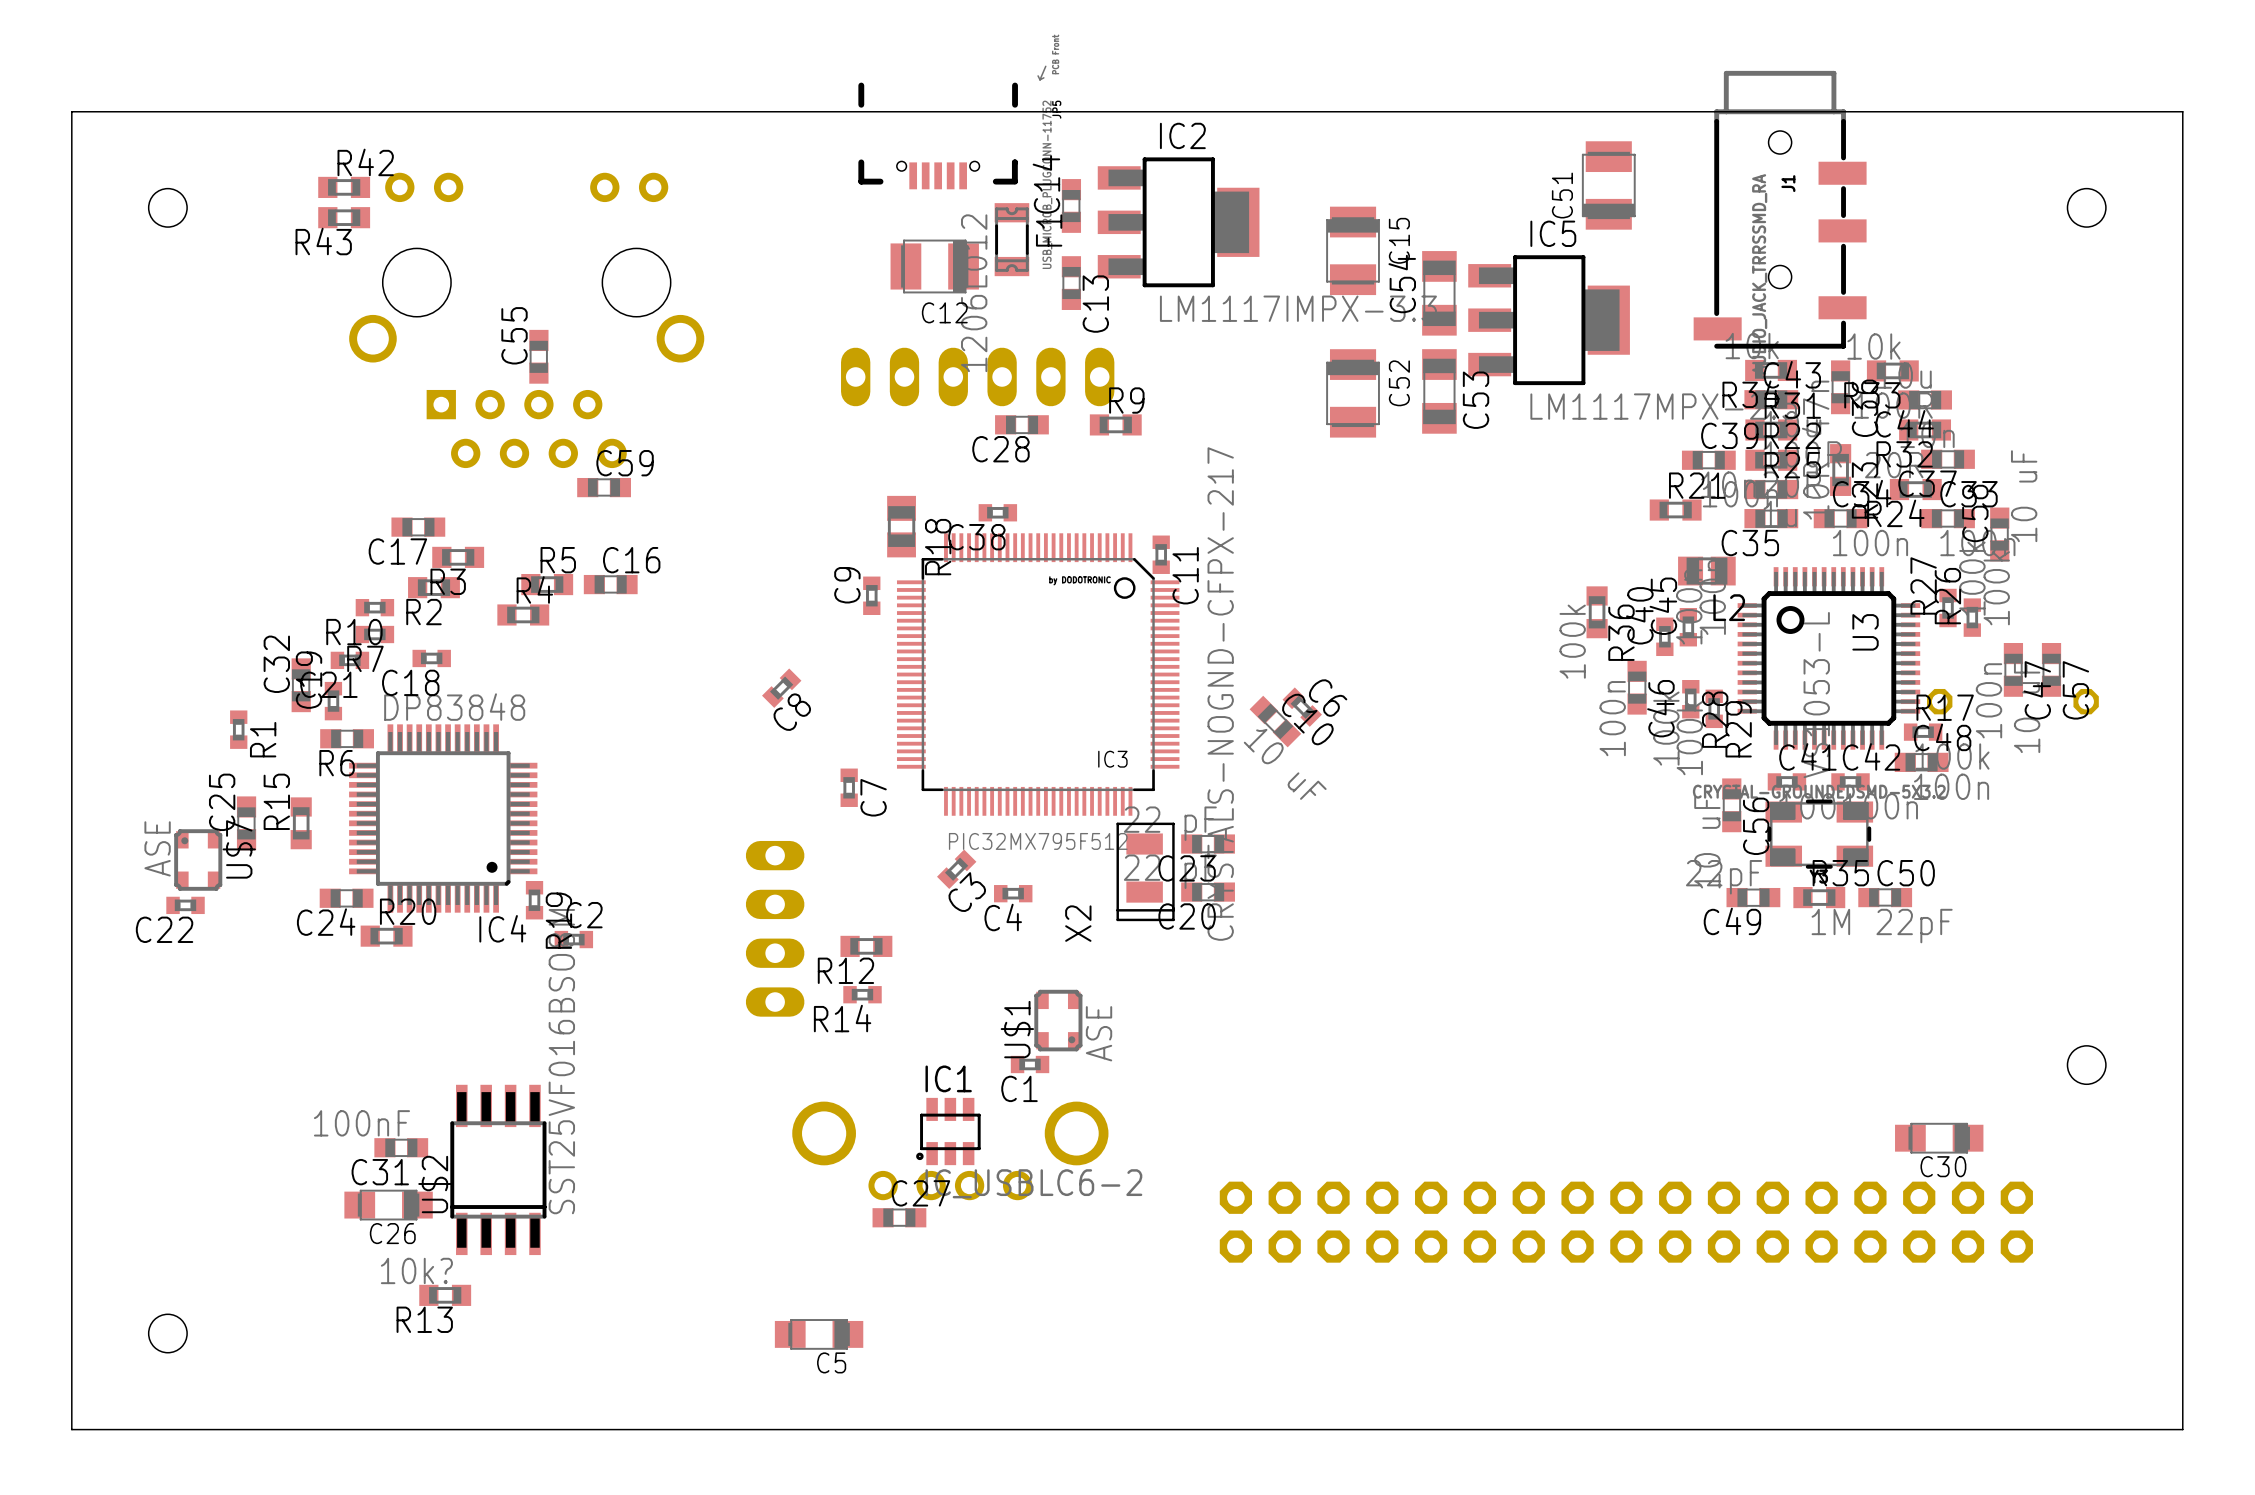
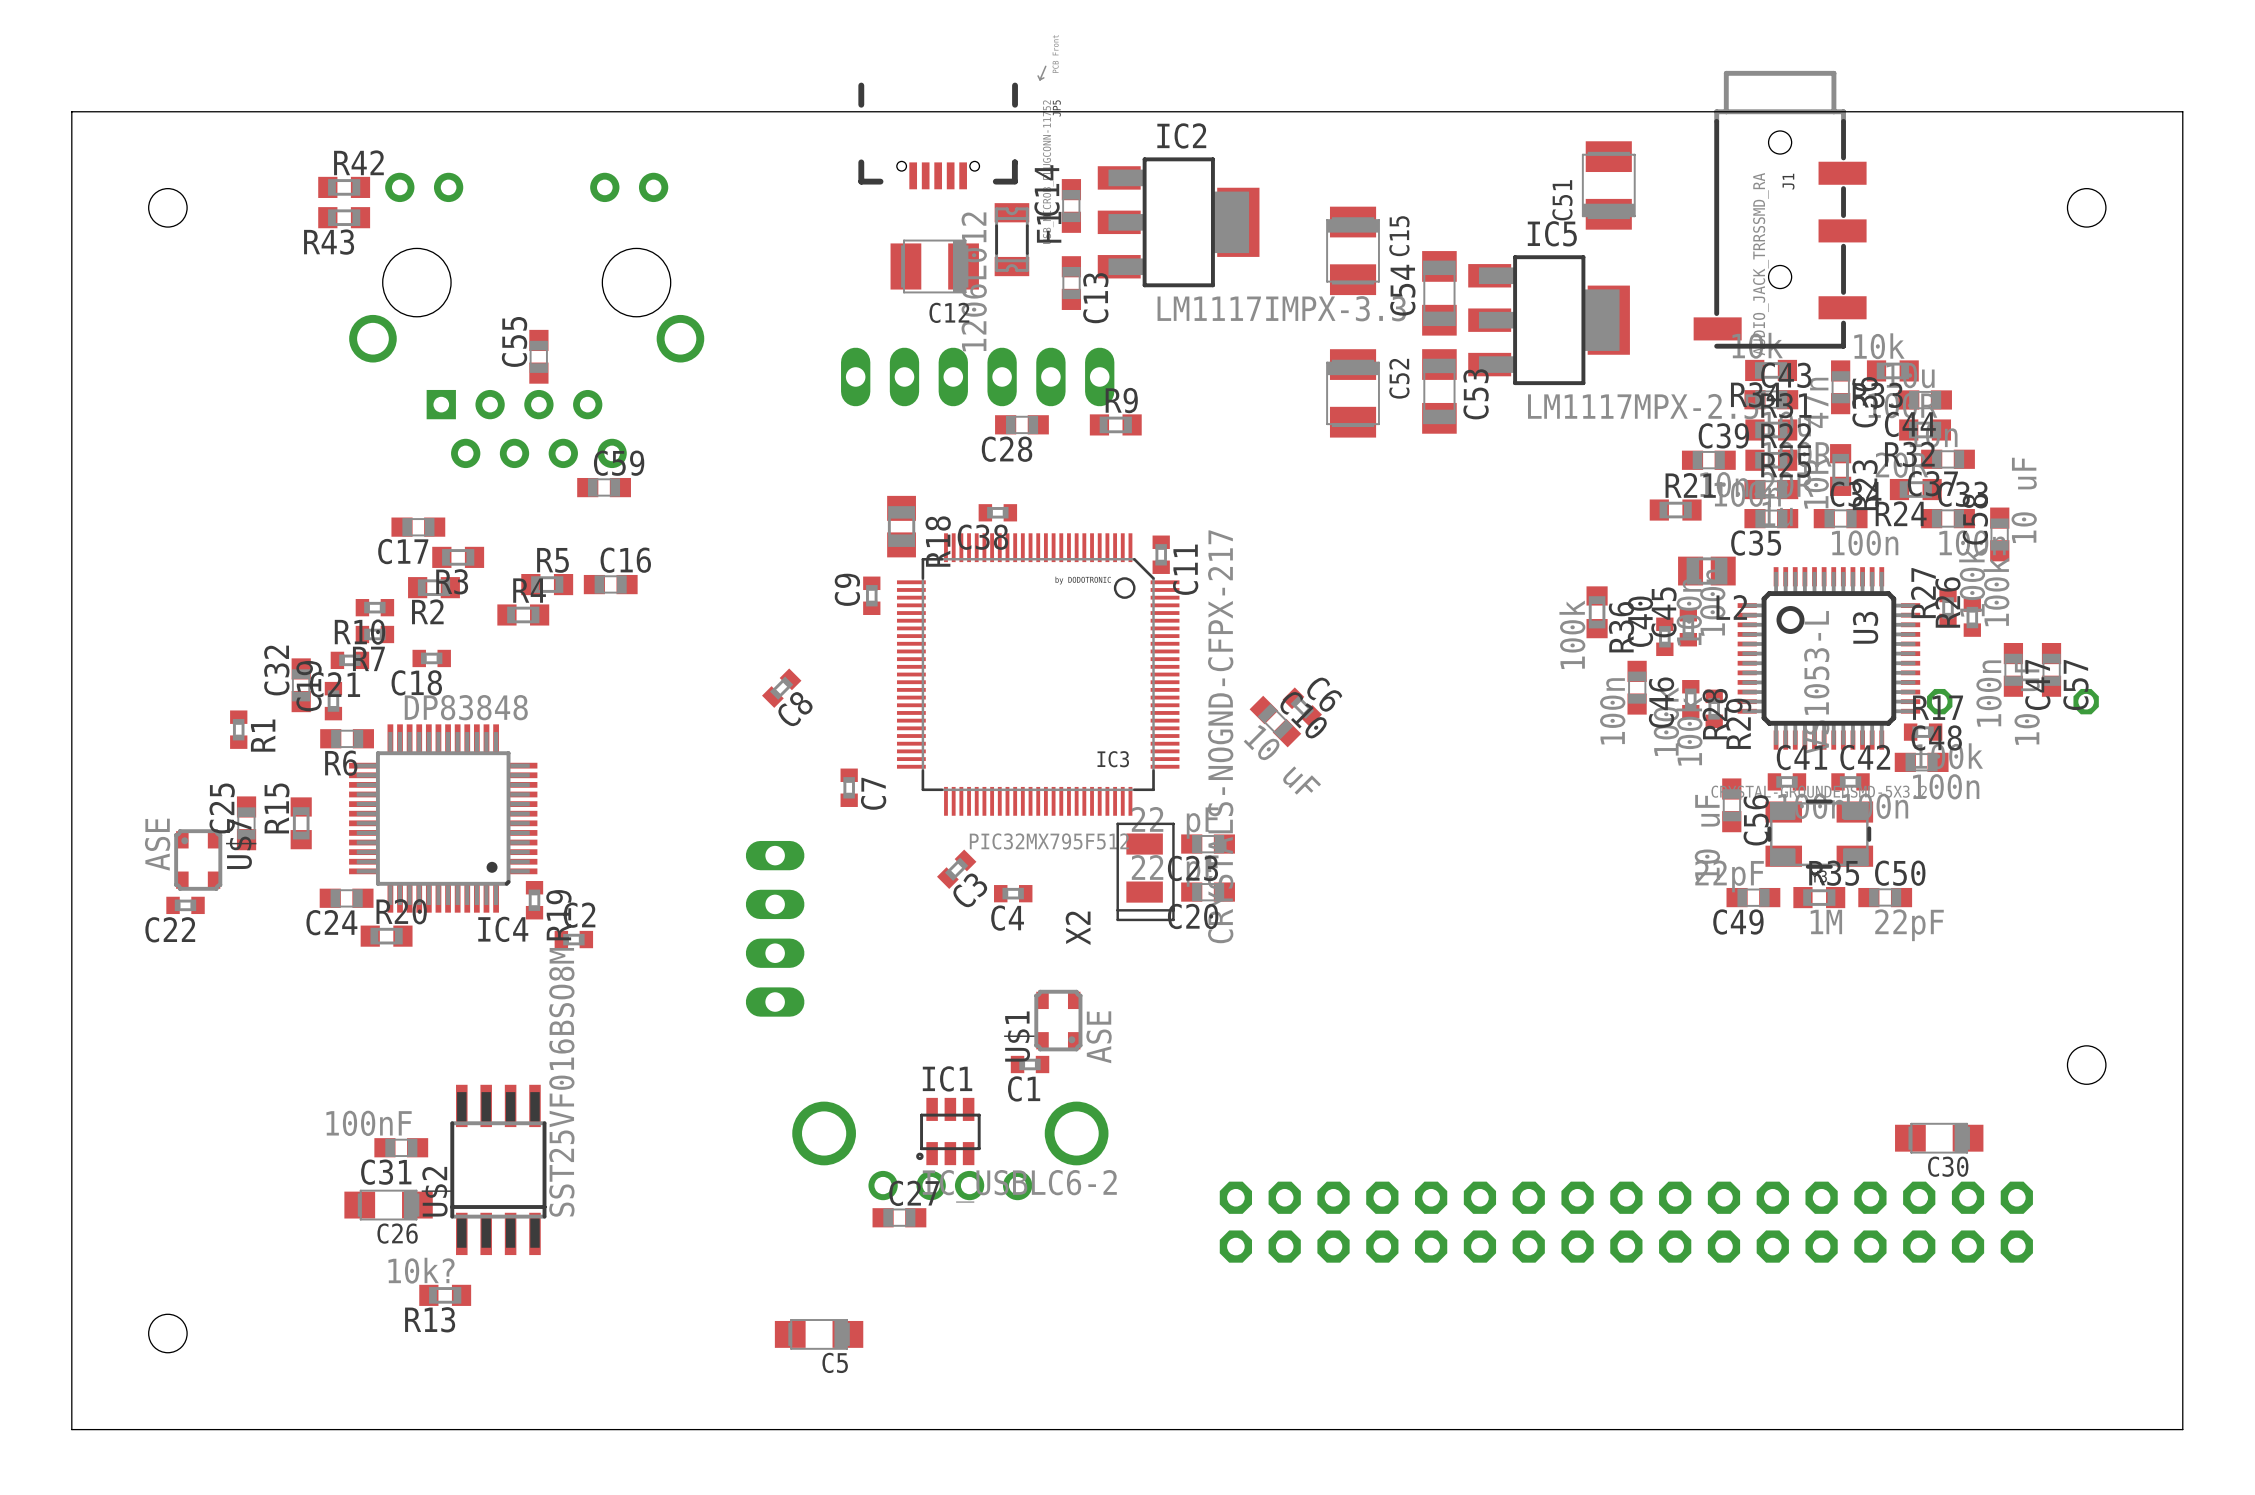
R12: (866, 946) -> none
R14: (862, 994) -> none

